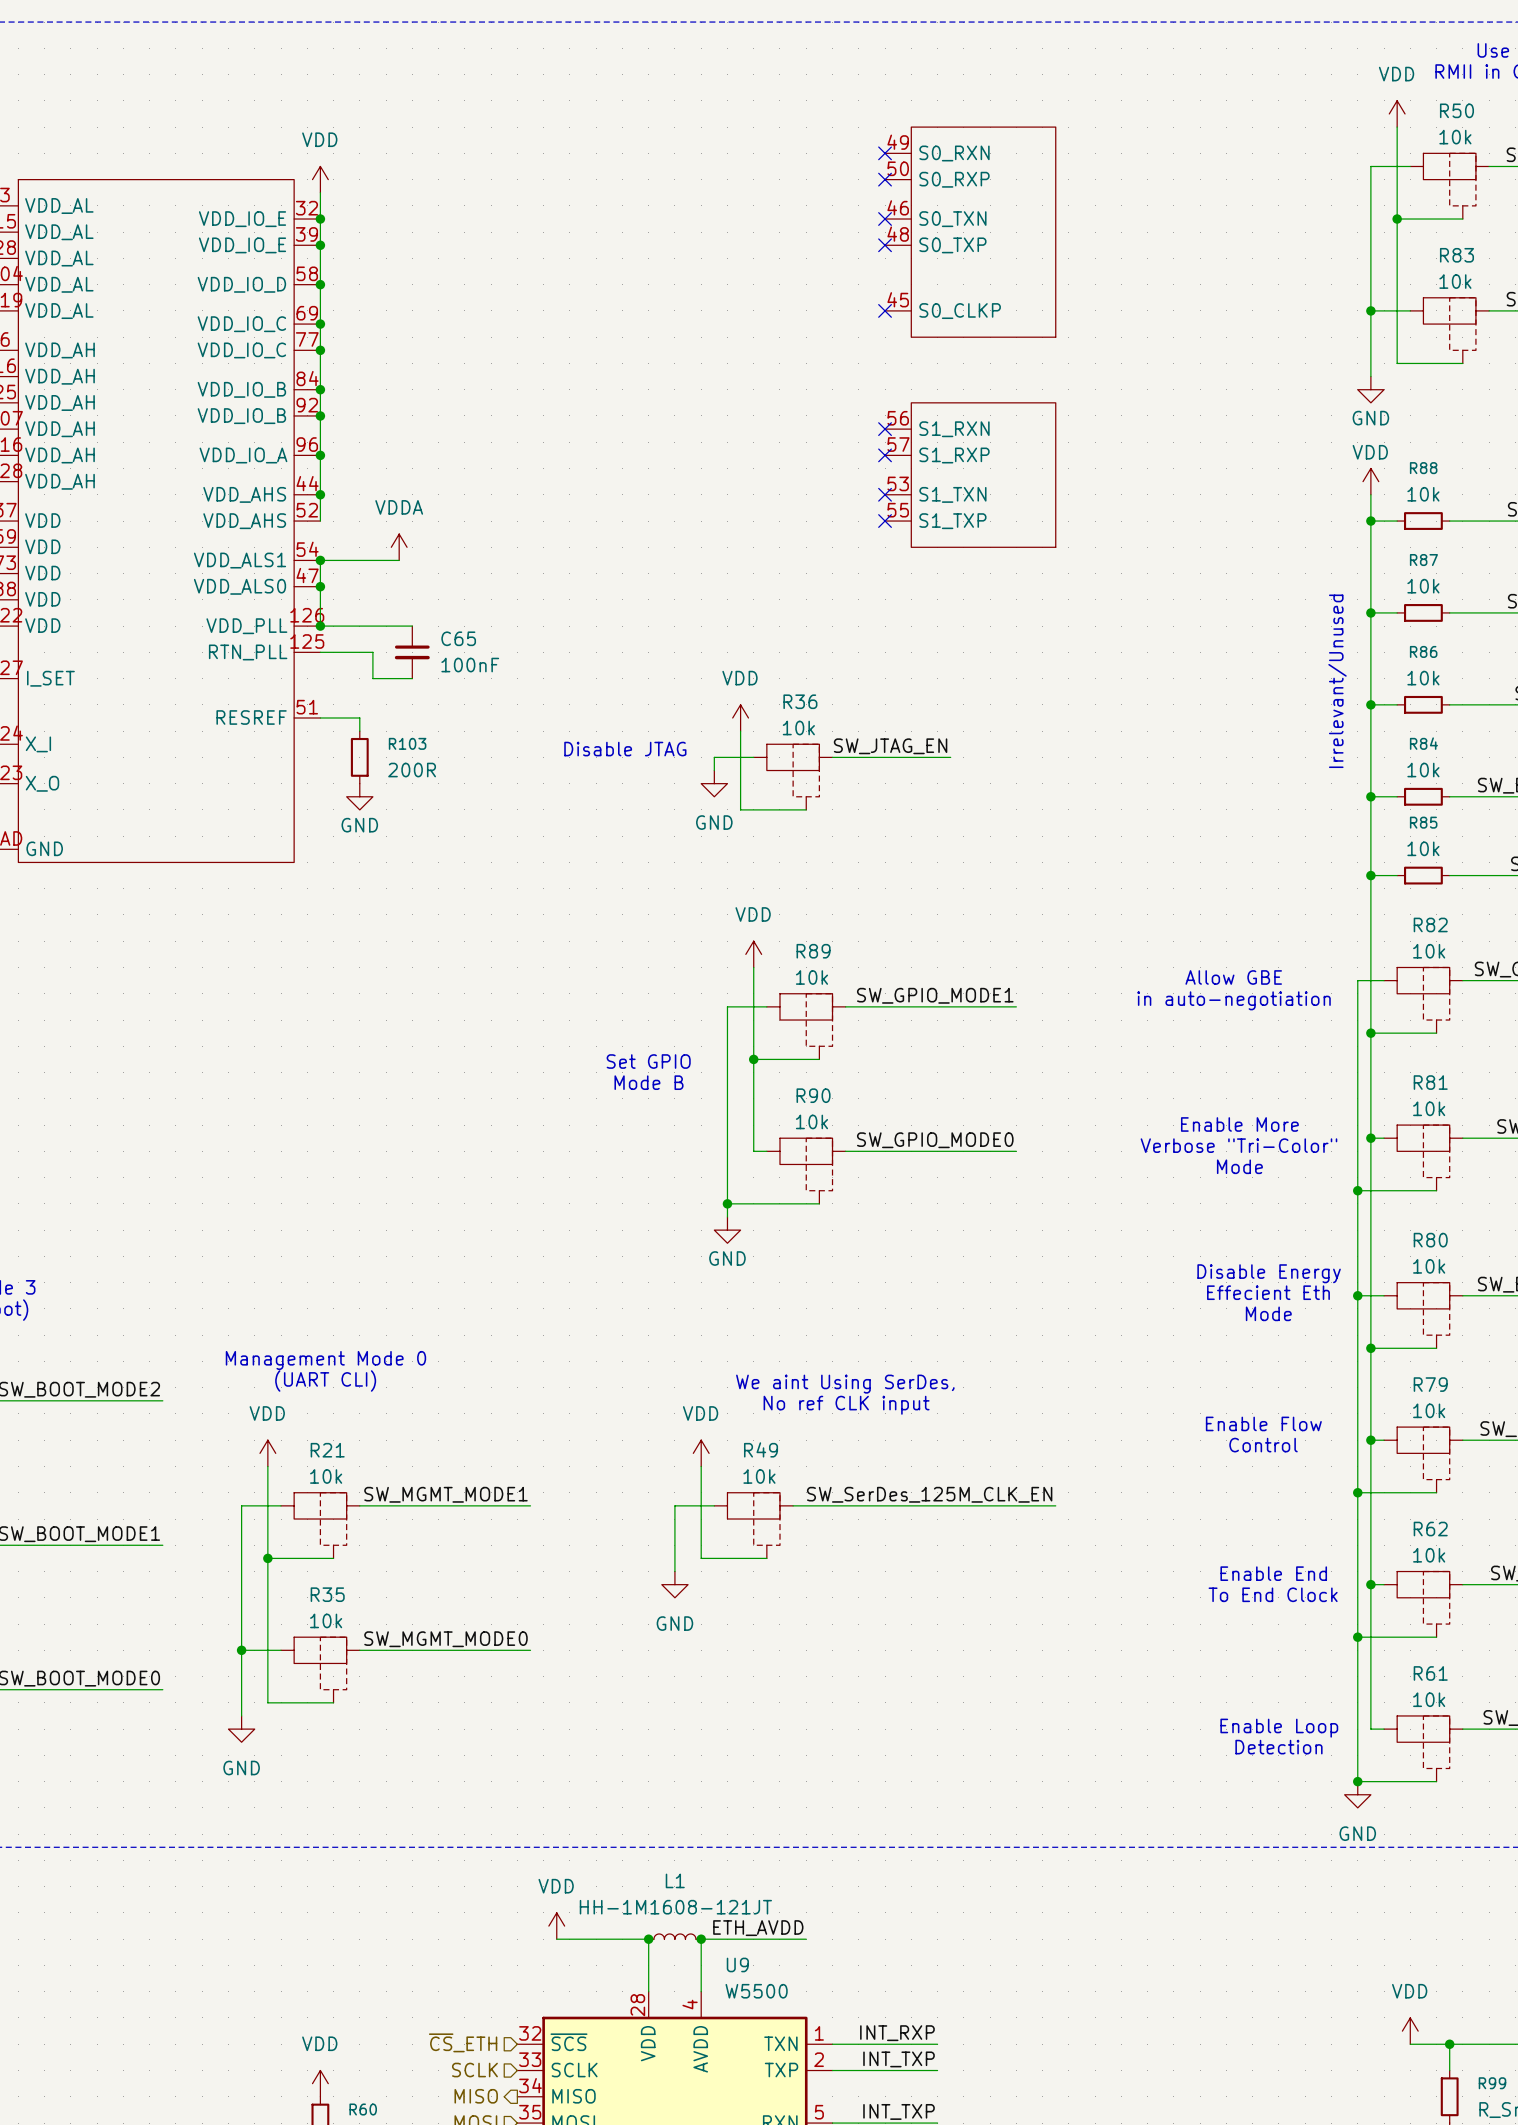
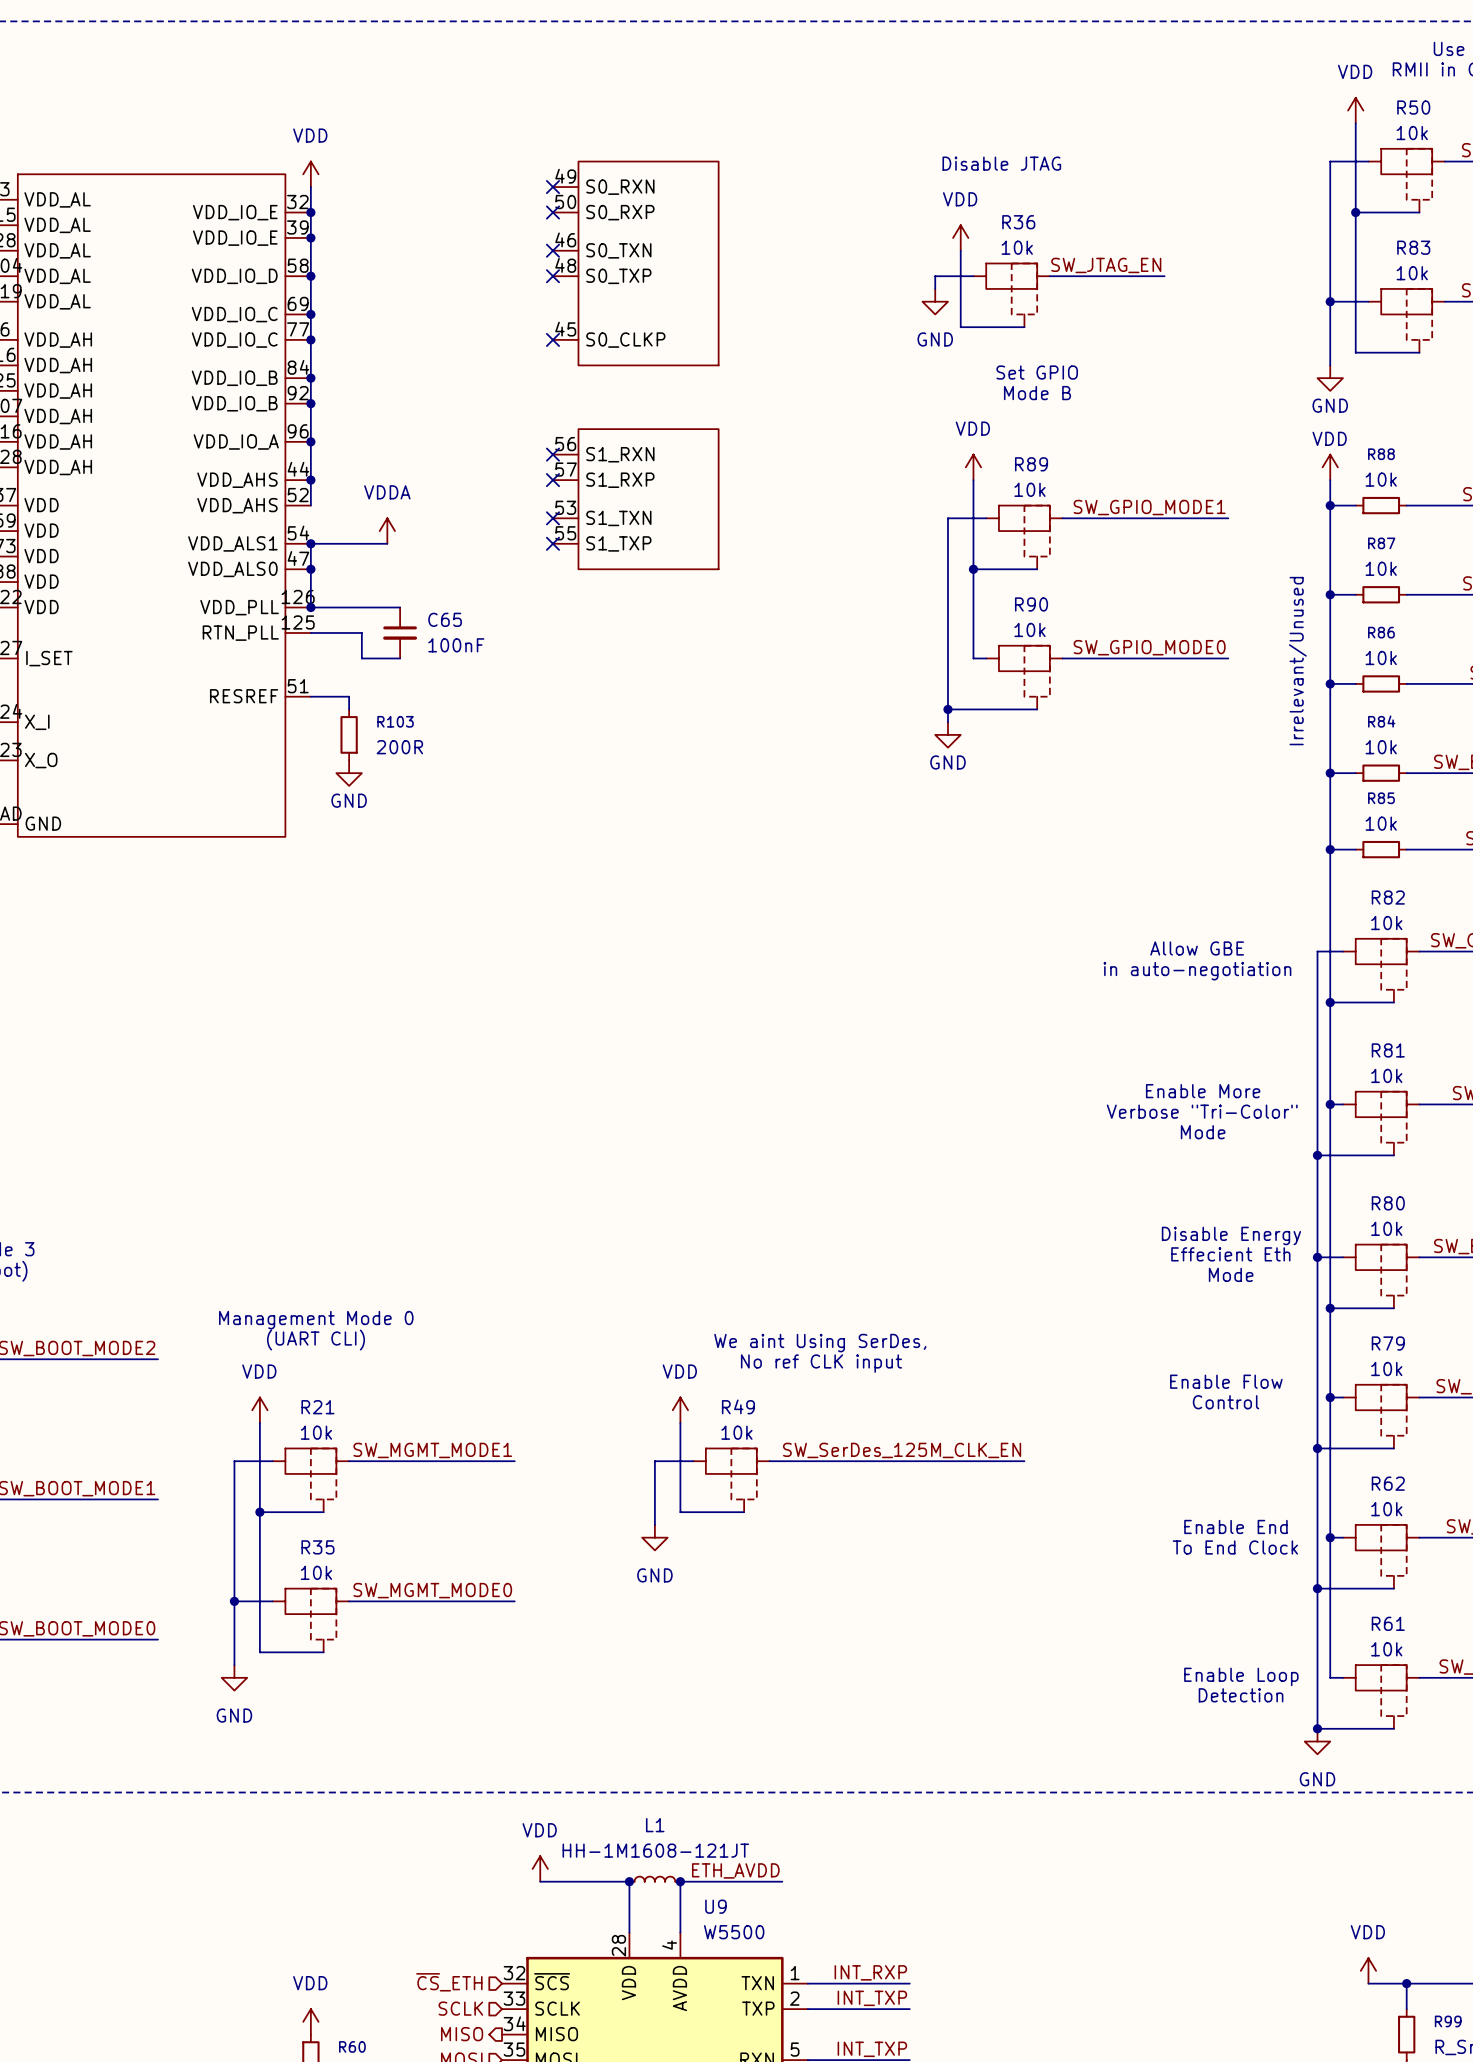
no-connect mark: (885, 153) -> none
text: none -> Disable JTAG (1001, 163)
no-connect mark: (885, 179) -> none
no-connect mark: none -> (552, 187)
no-connect mark: none -> (552, 212)
no-connect mark: (885, 219) -> none
part: (970, 232) -> none
no-connect mark: (885, 245) -> none
power symbol: none -> VDD (960, 237)
no-connect mark: none -> (552, 250)
wire: none -> (960, 250) (960, 327) (1024, 327)
part: none -> (635, 263)
label: none -> SW_JTAG_EN (1106, 265)
no-connect mark: none -> (552, 276)
wire: none -> (973, 276) (935, 276) (935, 288)
wire: none -> (1049, 276) (1164, 276)
no-connect mark: (885, 310) -> none
power symbol: none -> GND (935, 301)
no-connect mark: none -> (552, 339)
text: none -> Set GPIO (1037, 372)
text: none -> Mode B (1037, 393)
no-connect mark: (885, 429) -> none
no-connect mark: (885, 455) -> none
no-connect mark: none -> (552, 454)
part: (970, 475) -> none
power symbol: none -> VDD (973, 467)
no-connect mark: none -> (552, 480)
no-connect mark: (885, 494) -> none
wire: none -> (973, 480) (973, 658) (986, 658)
part: none -> (635, 499)
no-connect mark: (885, 521) -> none
label: none -> SW_GPIO_MODE1 (1149, 507)
no-connect mark: none -> (552, 518)
wire: none -> (986, 518) (947, 518) (947, 722)
wire: none -> (1062, 518) (1228, 518)
no-connect mark: none -> (552, 543)
wire: none -> (973, 569) (1037, 569)
junction: none -> (973, 569)
label: none -> SW_GPIO_MODE0 (1149, 647)
wire: none -> (1062, 658) (1228, 658)
power symbol: VDD (740, 717) -> none
wire: (740, 731) (740, 809) (806, 809) -> none
wire: none -> (947, 709) (1037, 709)
junction: none -> (947, 709)
label: SW_JTAG_EN (890, 746) -> none
text: Disable JTAG (625, 749) -> none
wire: (753, 757) (714, 757) (714, 770) -> none
wire: (832, 757) (950, 757) -> none
power symbol: none -> GND (947, 734)
R36 position: (793, 777) -> (1011, 295)
power symbol: GND (714, 783) -> none
power symbol: VDD (753, 954) -> none
wire: (753, 967) (753, 1151) (766, 1151) -> none
label: SW_GPIO_MODE1 (935, 995) -> none
wire: (766, 1006) (727, 1006) (727, 1216) -> none
wire: (845, 1006) (1016, 1006) -> none
R89 position: (806, 1026) -> (1024, 537)
wire: (753, 1059) (819, 1059) -> none
junction: (753, 1059) -> none
text: Set GPIO (648, 1061) -> none
text: Mode B (648, 1082) -> none
label: SW_GPIO_MODE0 (935, 1140) -> none
wire: (845, 1151) (1016, 1151) -> none
R90 position: (806, 1171) -> (1024, 677)
wire: (727, 1203) (819, 1203) -> none
junction: (727, 1203) -> none
power symbol: GND (727, 1230) -> none

